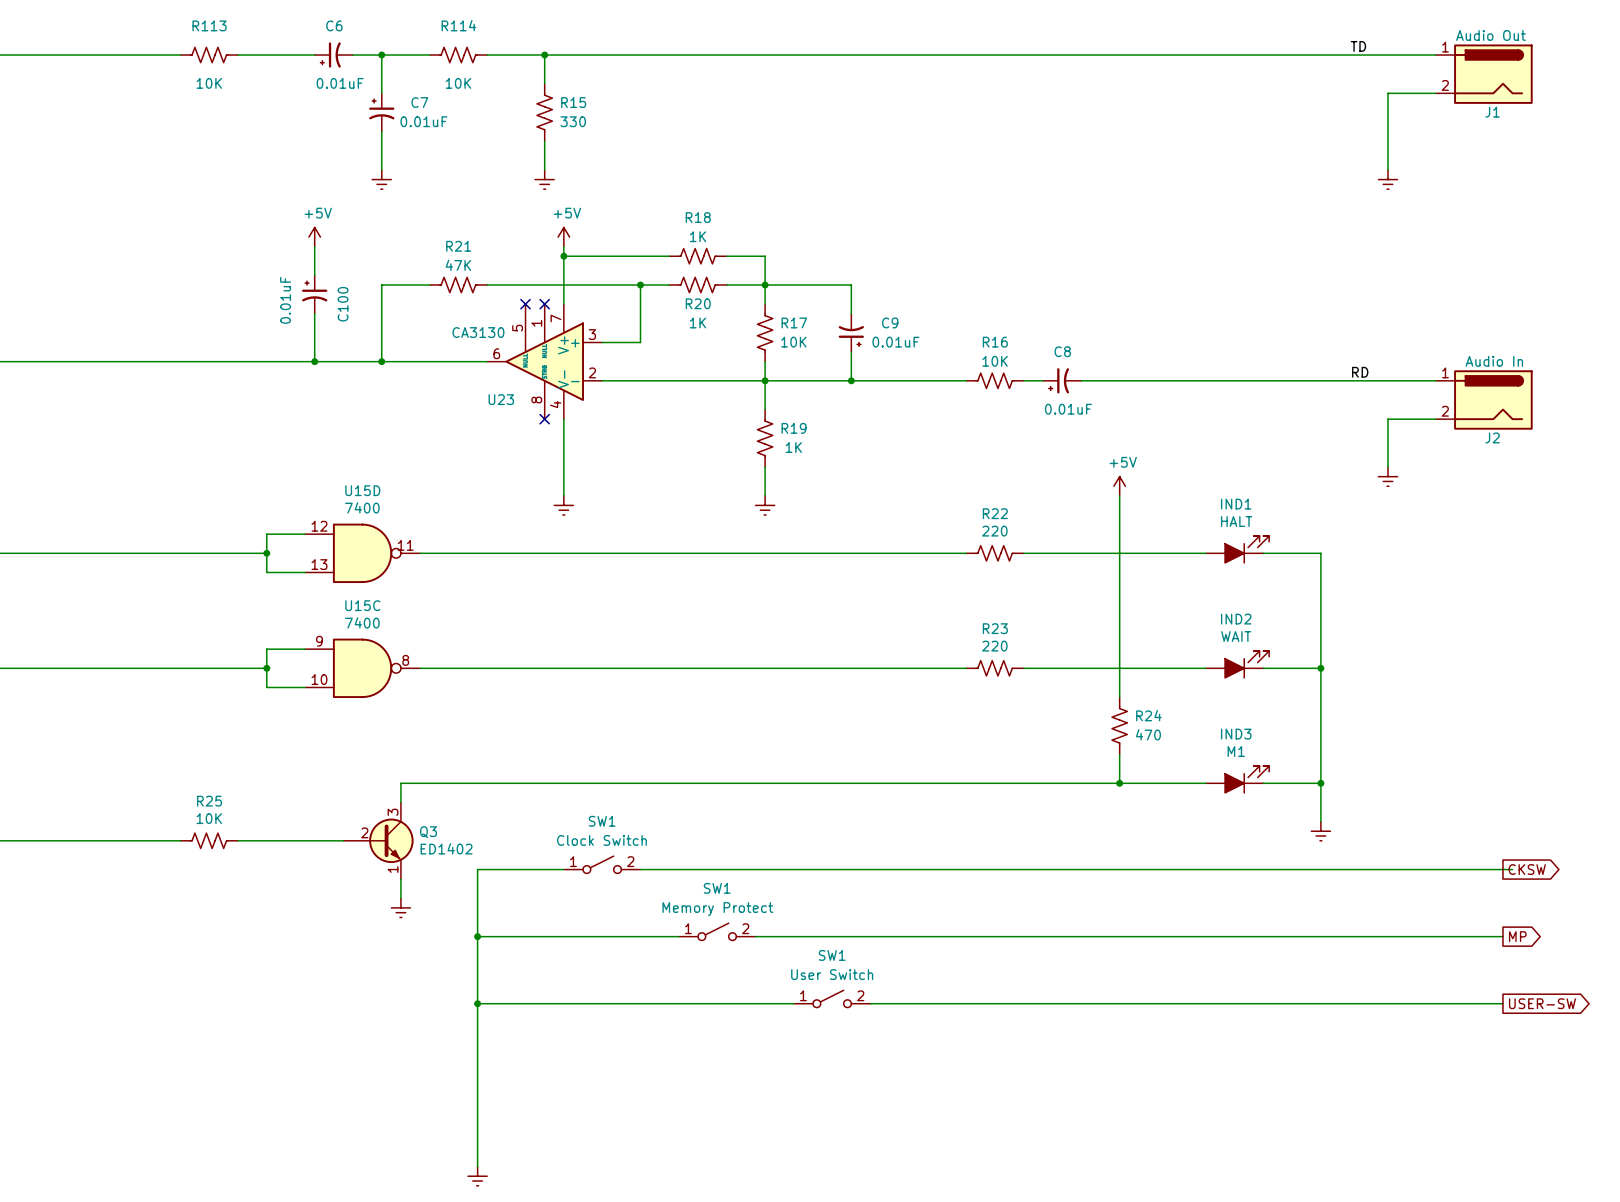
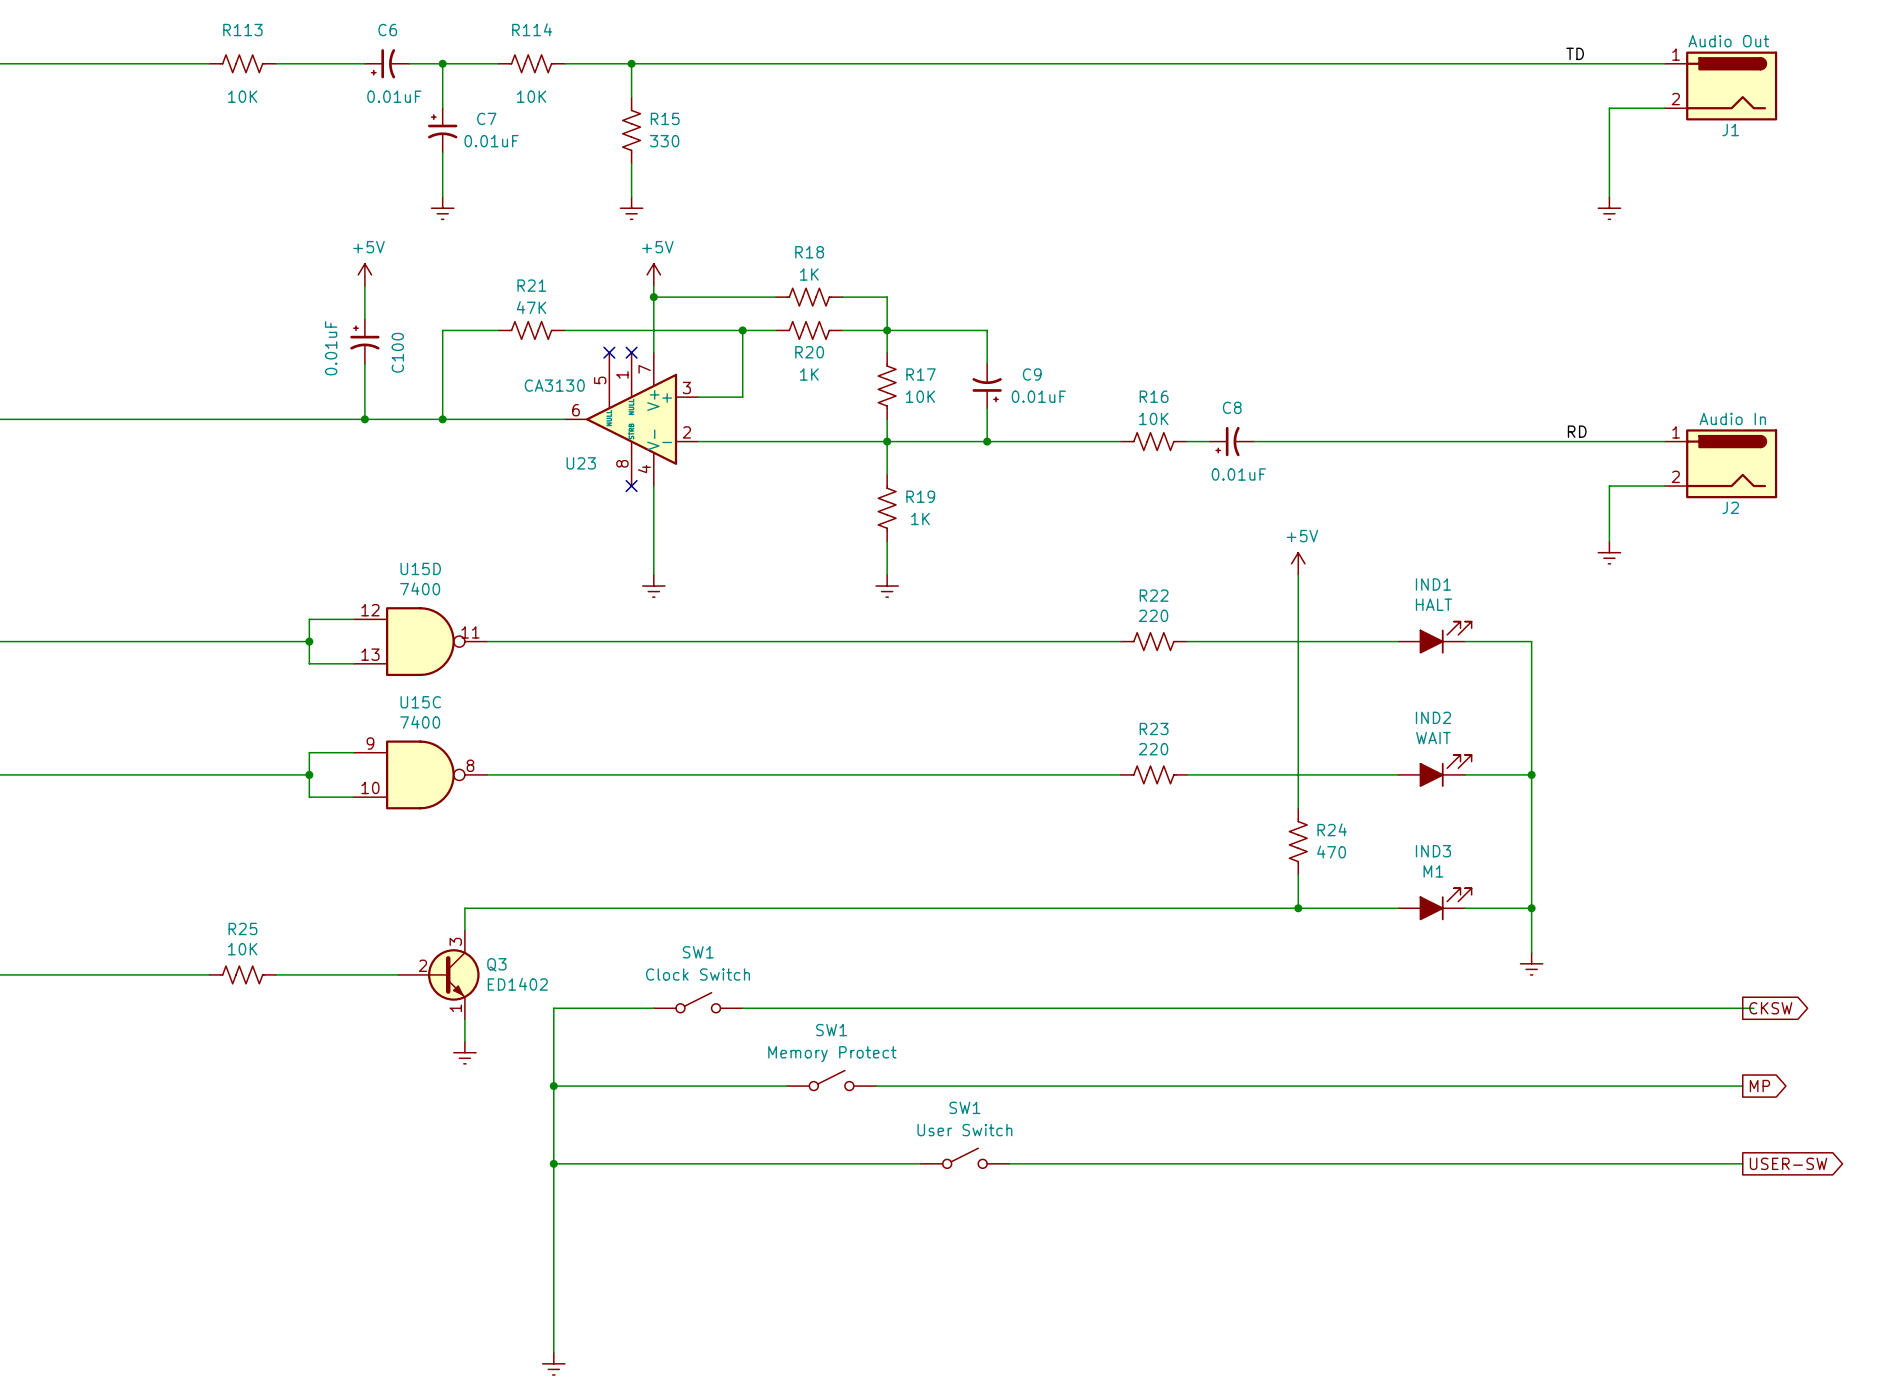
SW1 pin number: 1 (573, 861) -> none
SW1 pin number: 2 (630, 861) -> none
SW1 pin number: 1 (688, 928) -> none
SW1 pin number: 2 (745, 928) -> none
SW1 pin number: 1 (803, 995) -> none
SW1 pin number: 2 (860, 995) -> none

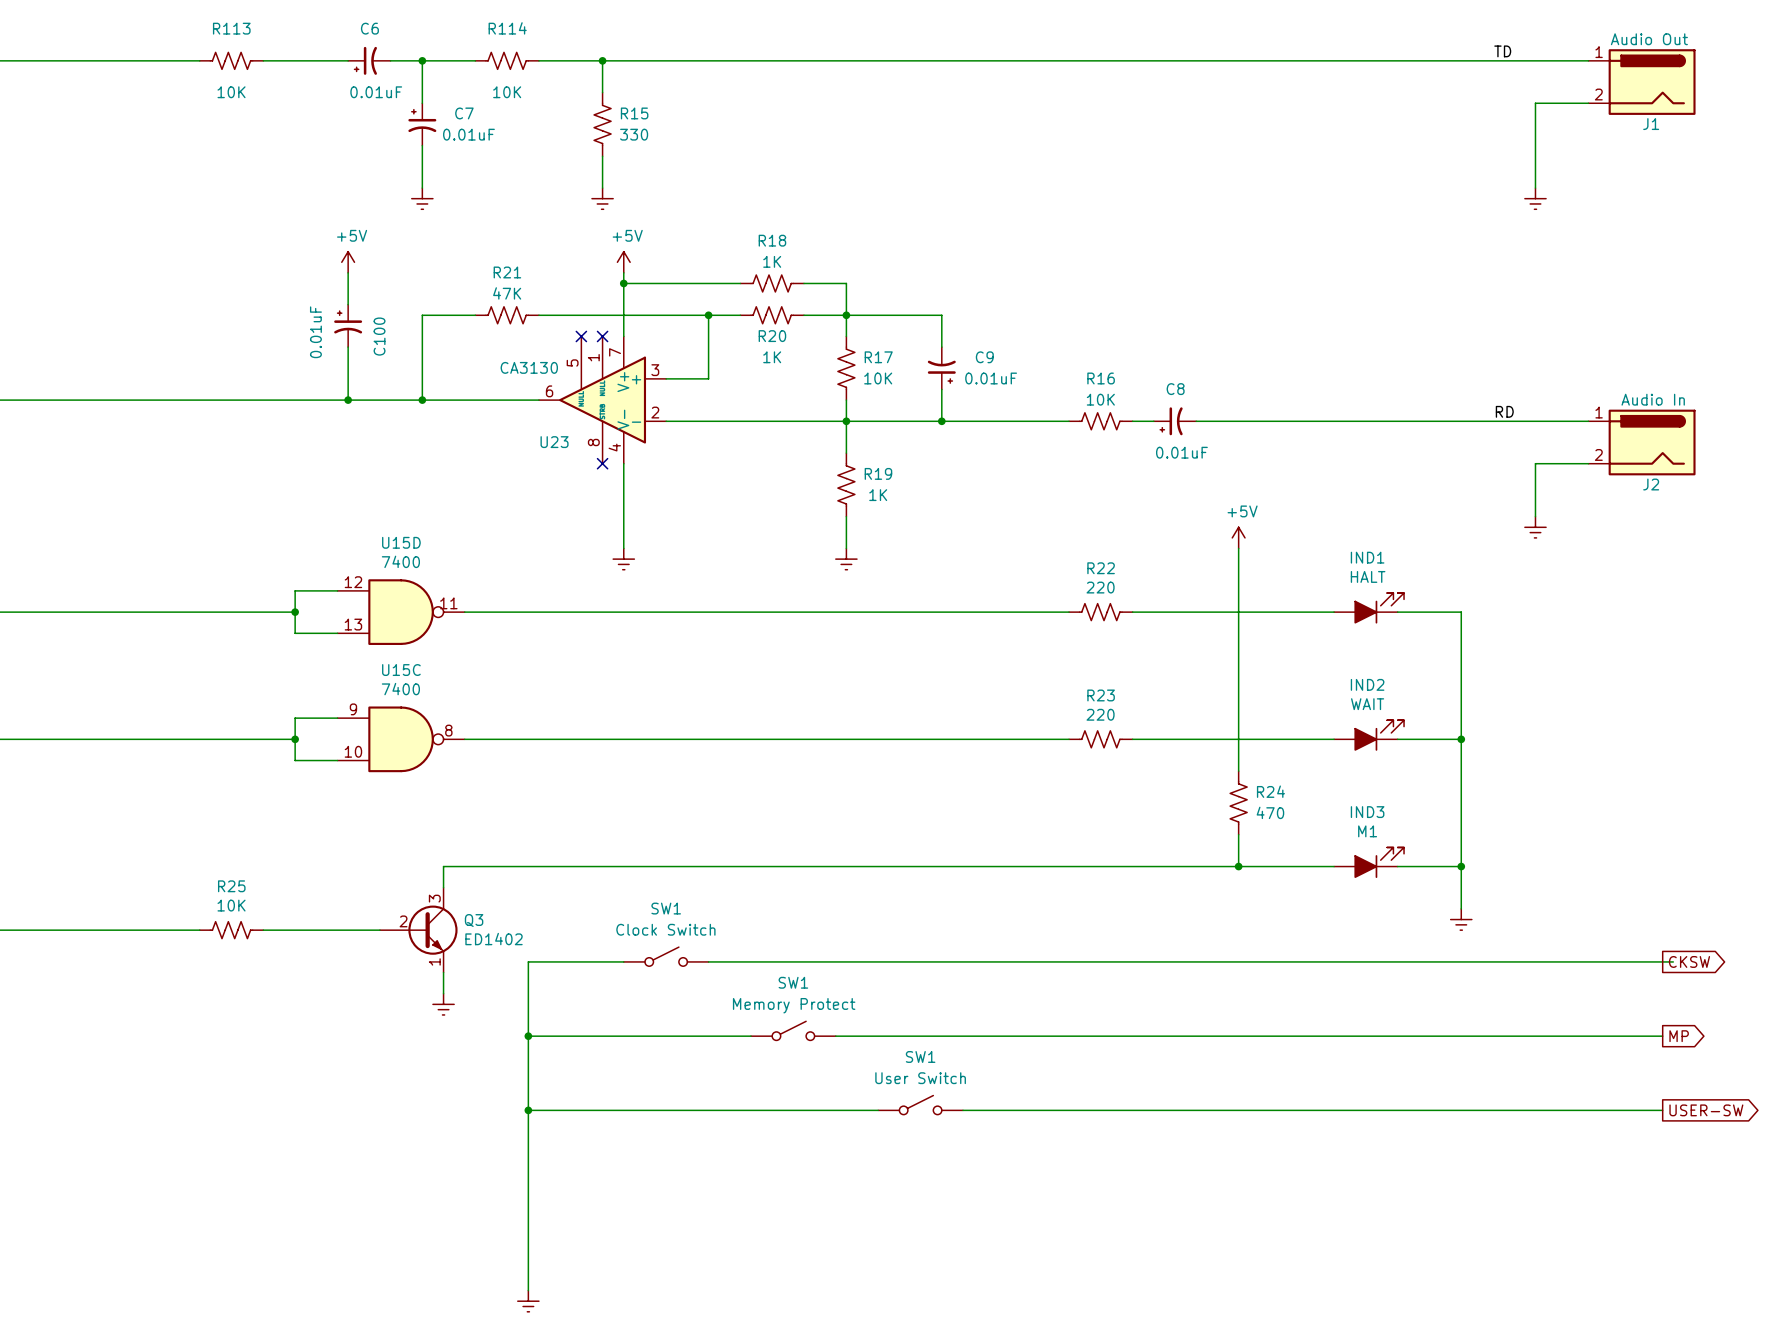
Q3 symbol: [398, 930, 480, 1020] -> [379, 887, 458, 973]

